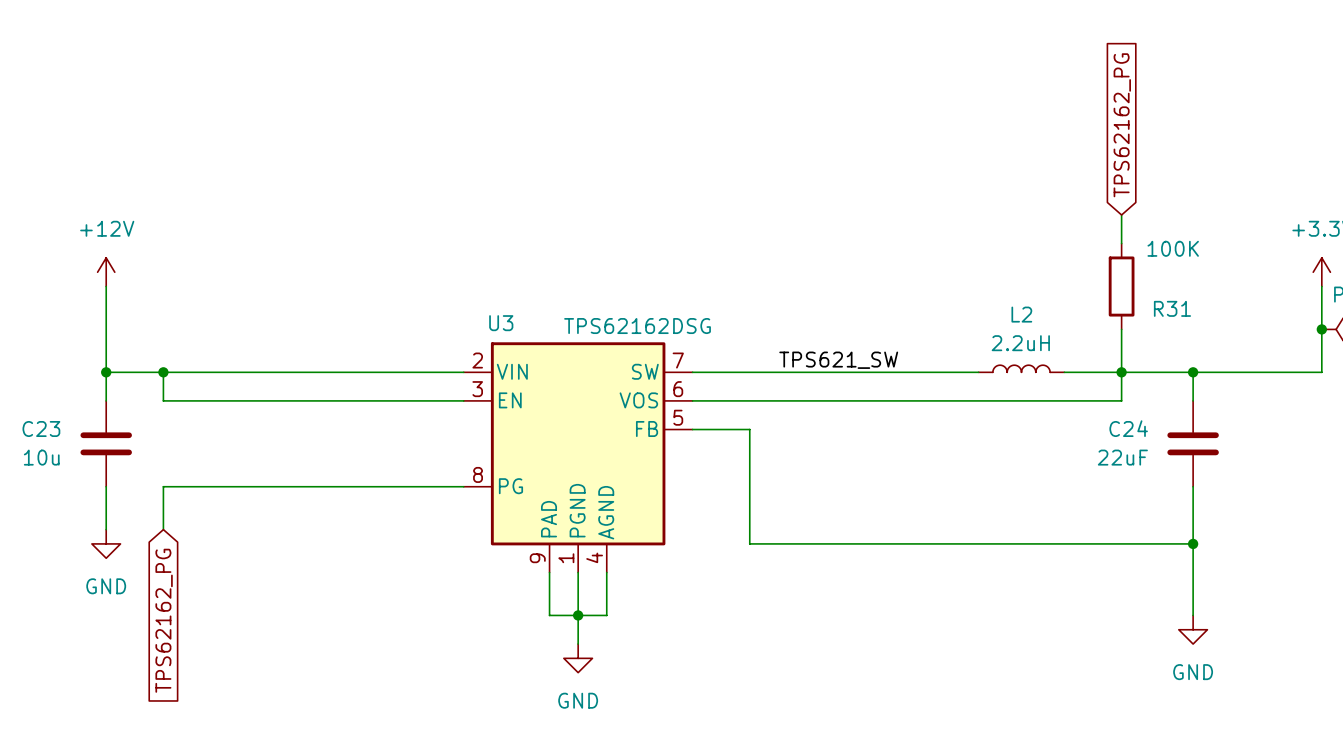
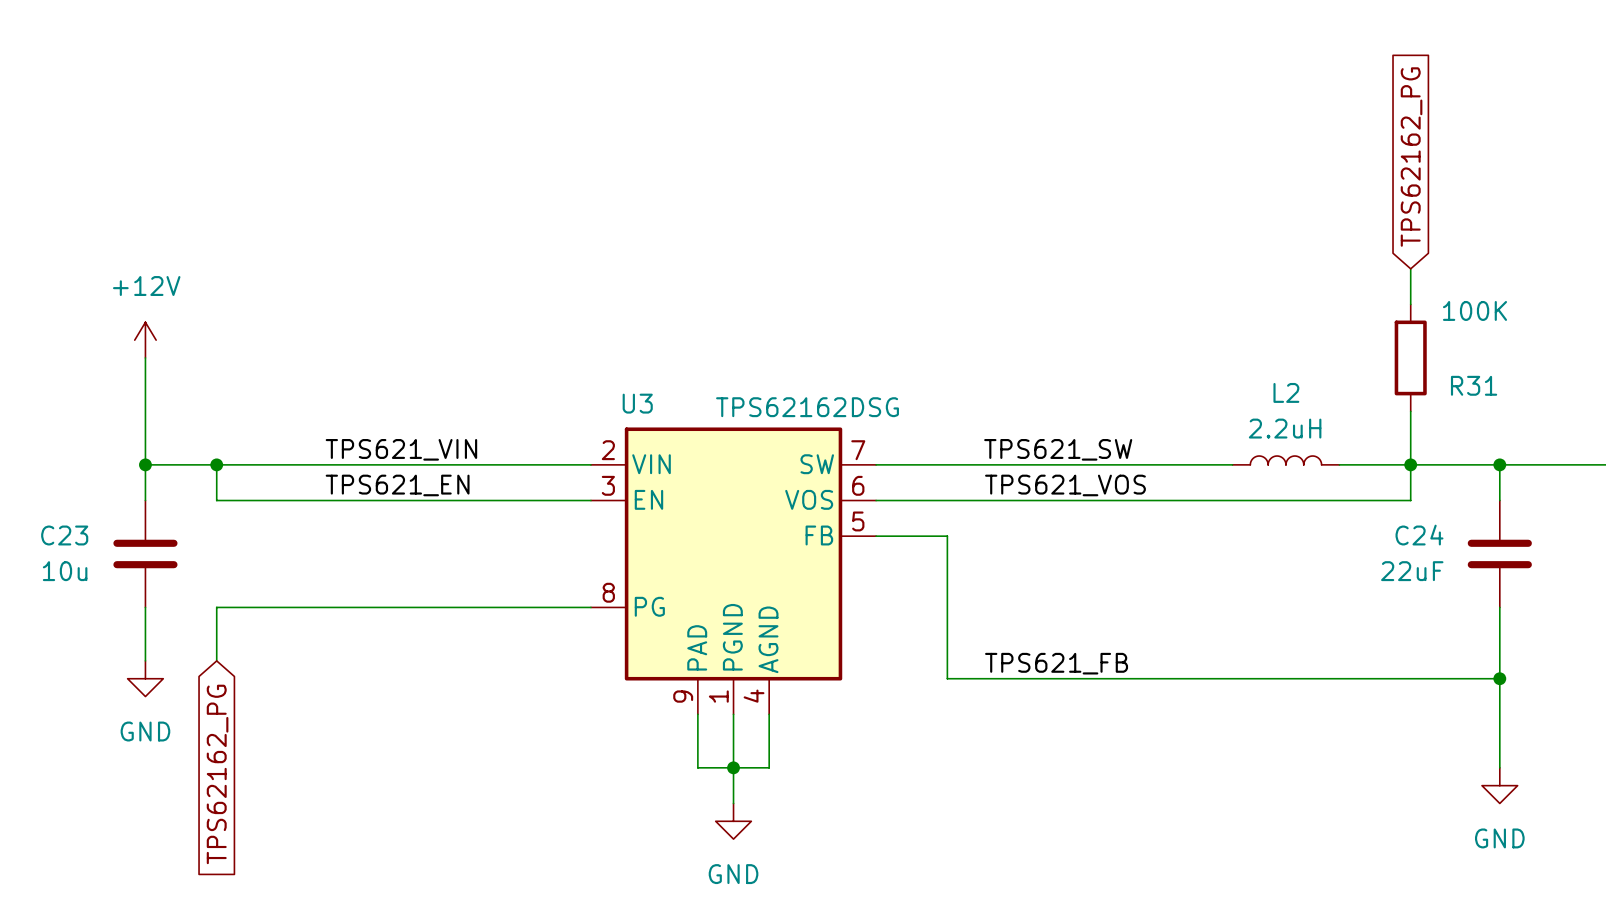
label: none -> TPS621_VIN (401, 449)
label: none -> TPS621_EN (397, 485)
label: none -> TPS621_VOS (1065, 485)
label: none -> TPS621_FB (1056, 663)

